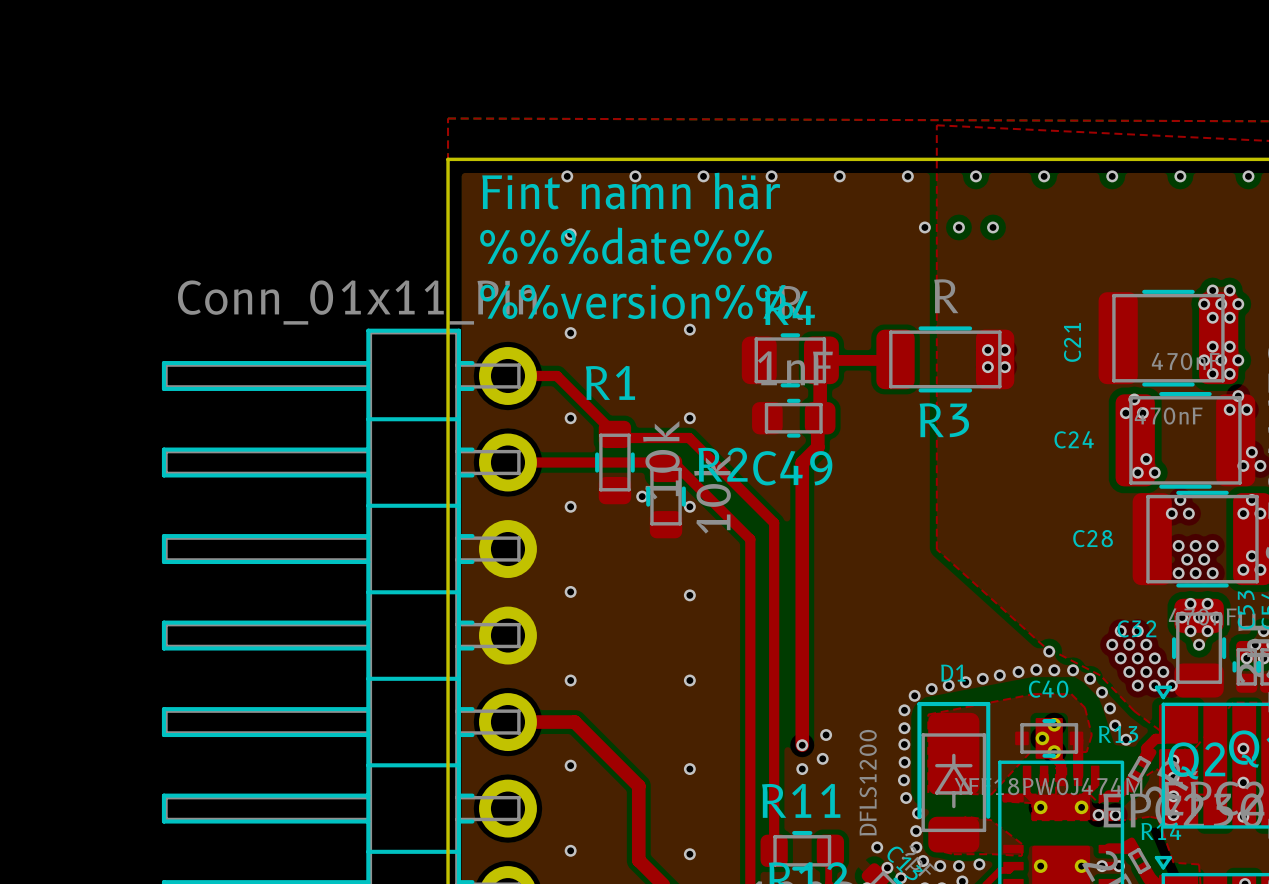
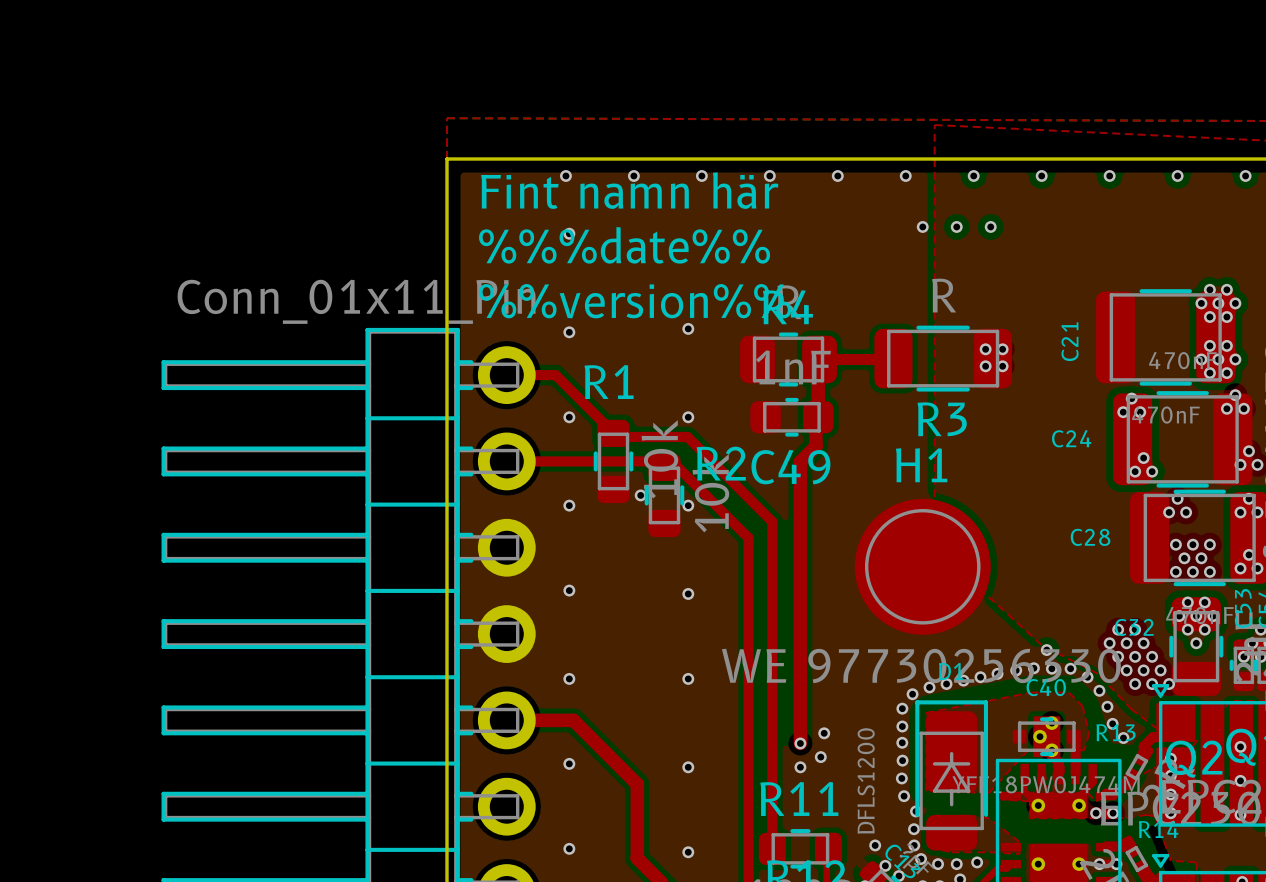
H1: none -> WE 97730256330 (922, 566)

